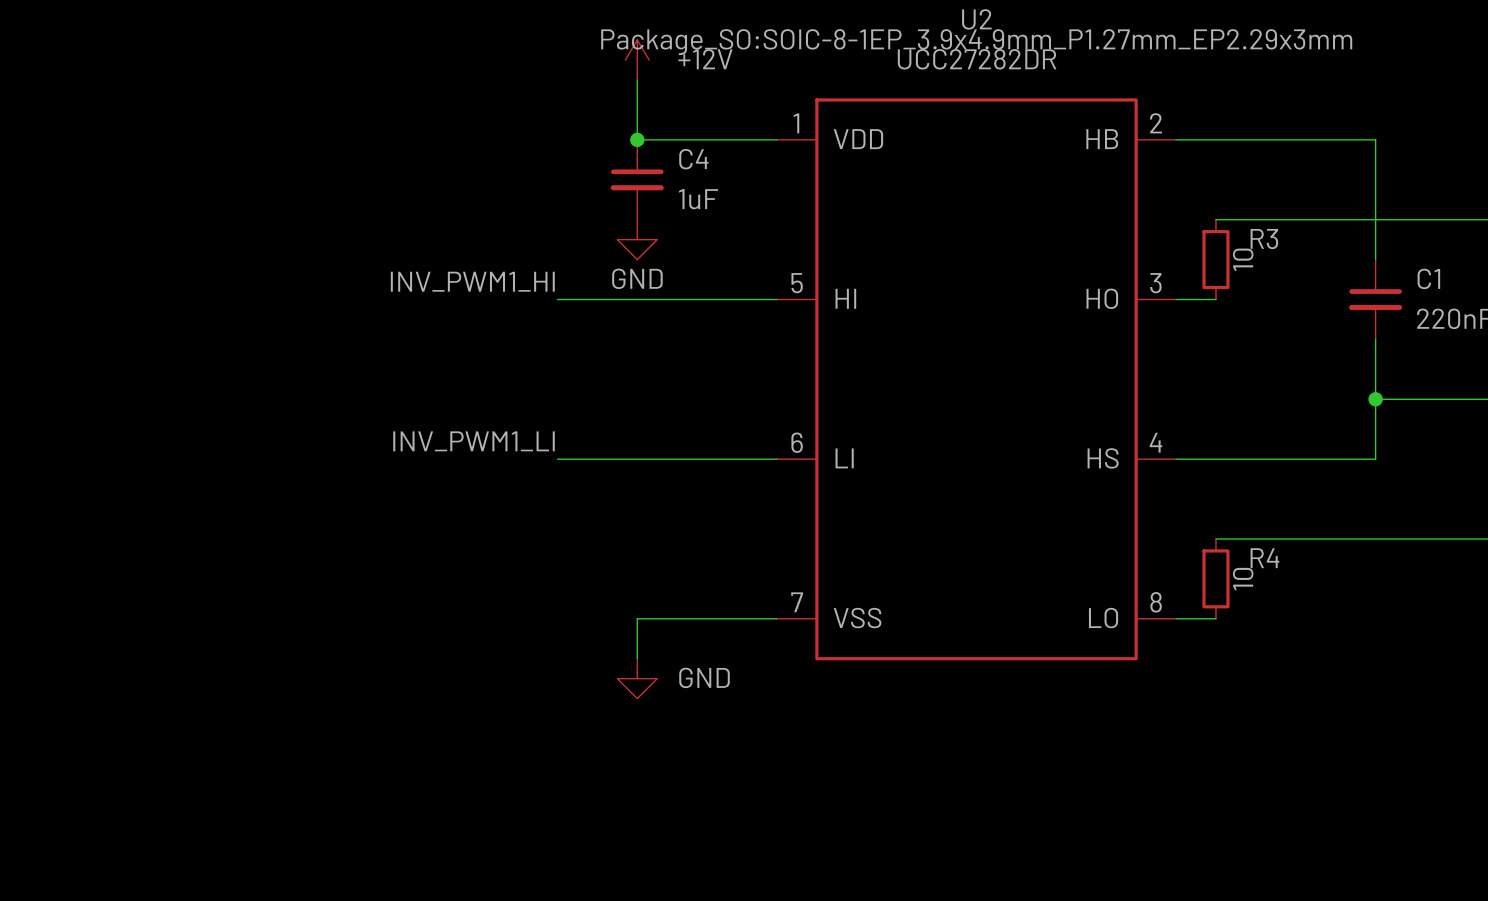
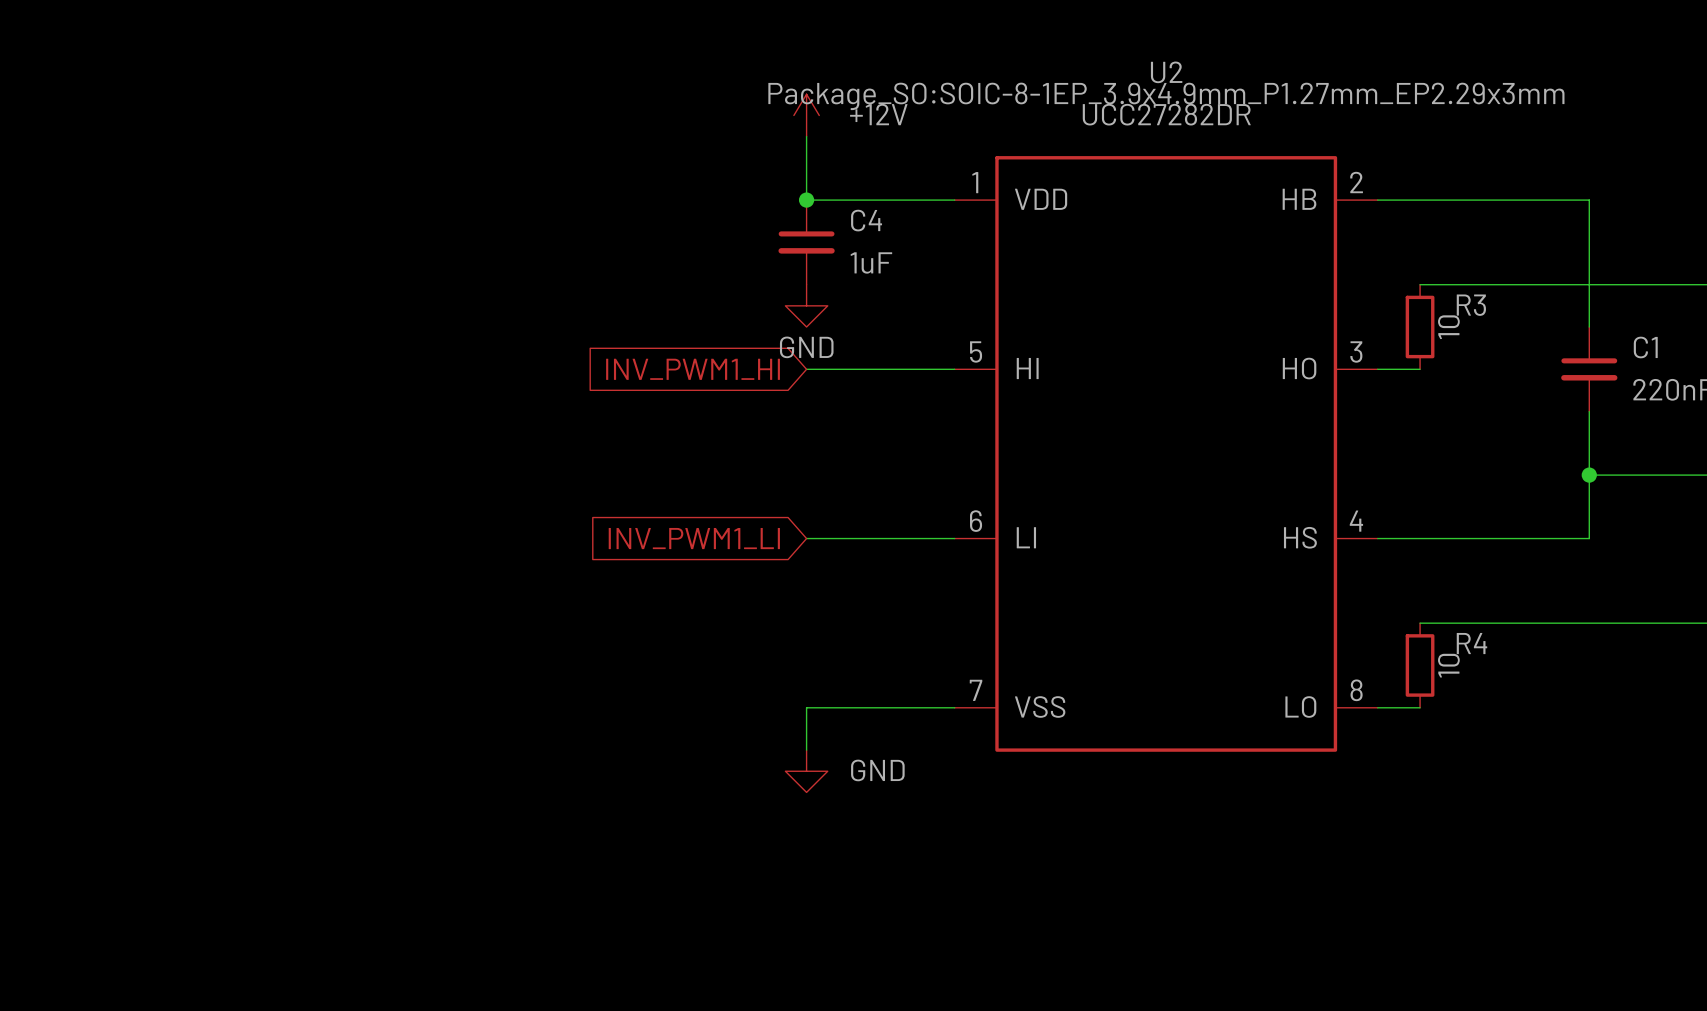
label: INV_PWM1_HI (472, 281) -> none
global label: none -> INV_PWM1_HI (693, 369)
wire: (557, 299) (637, 299) -> none
label: INV_PWM1_LI (474, 441) -> none
global label: none -> INV_PWM1_LI (694, 538)
wire: (557, 459) (637, 459) -> none

